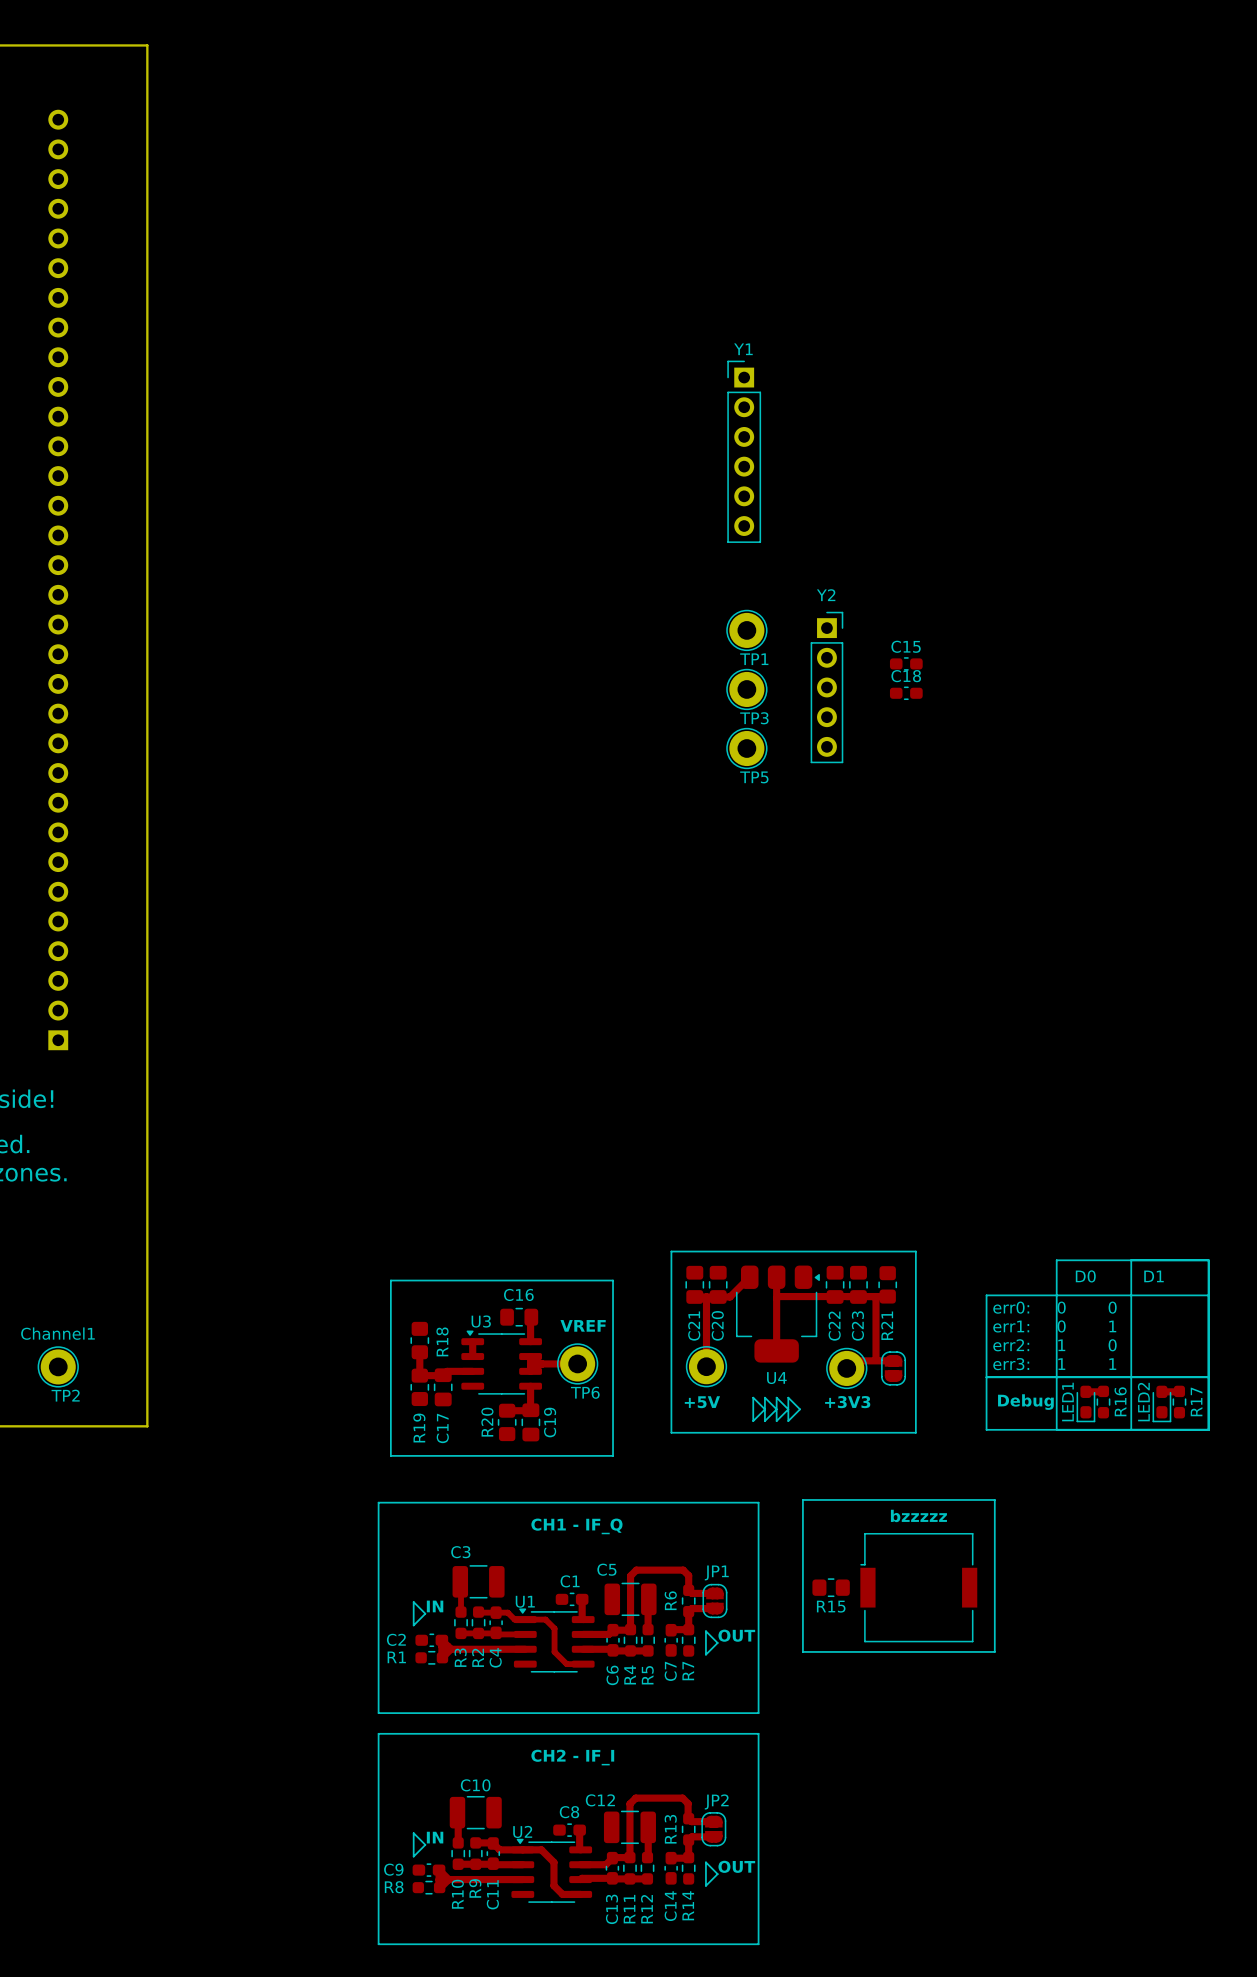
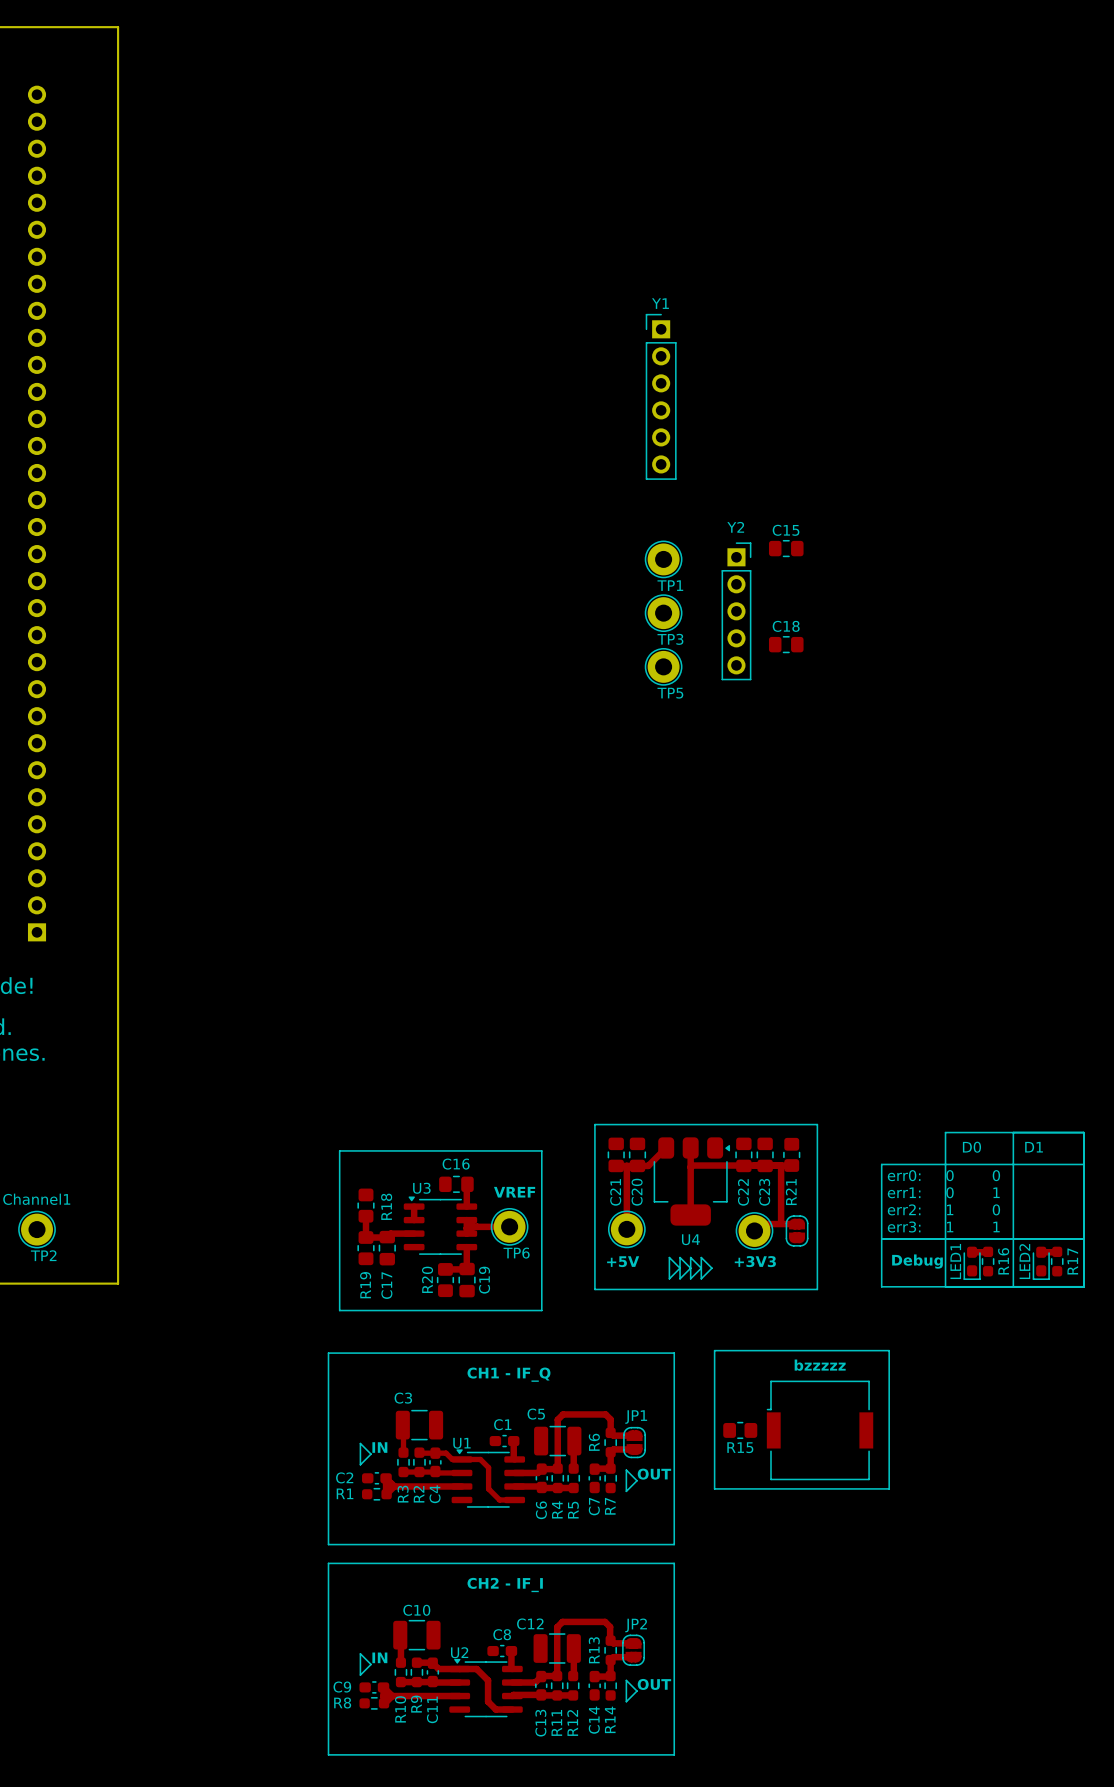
C15 footprint: [889, 657, 923, 671] -> [768, 540, 804, 558]
C18 footprint: [889, 686, 923, 700] -> [768, 636, 804, 654]

